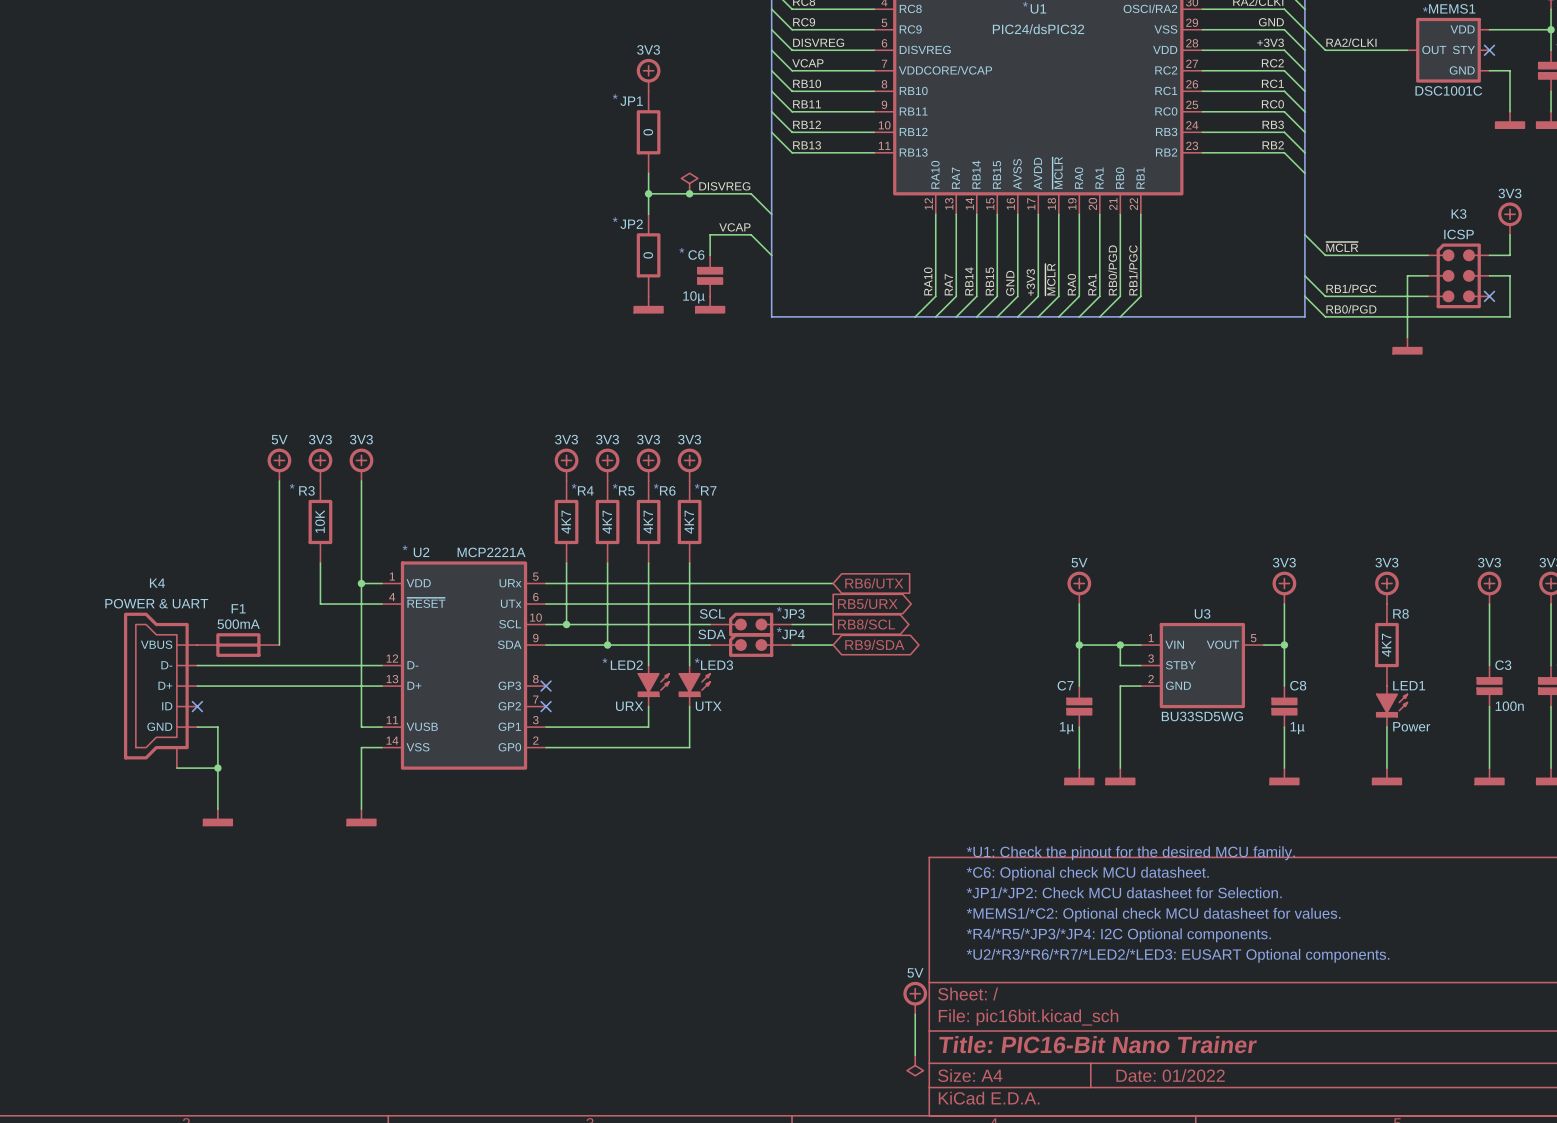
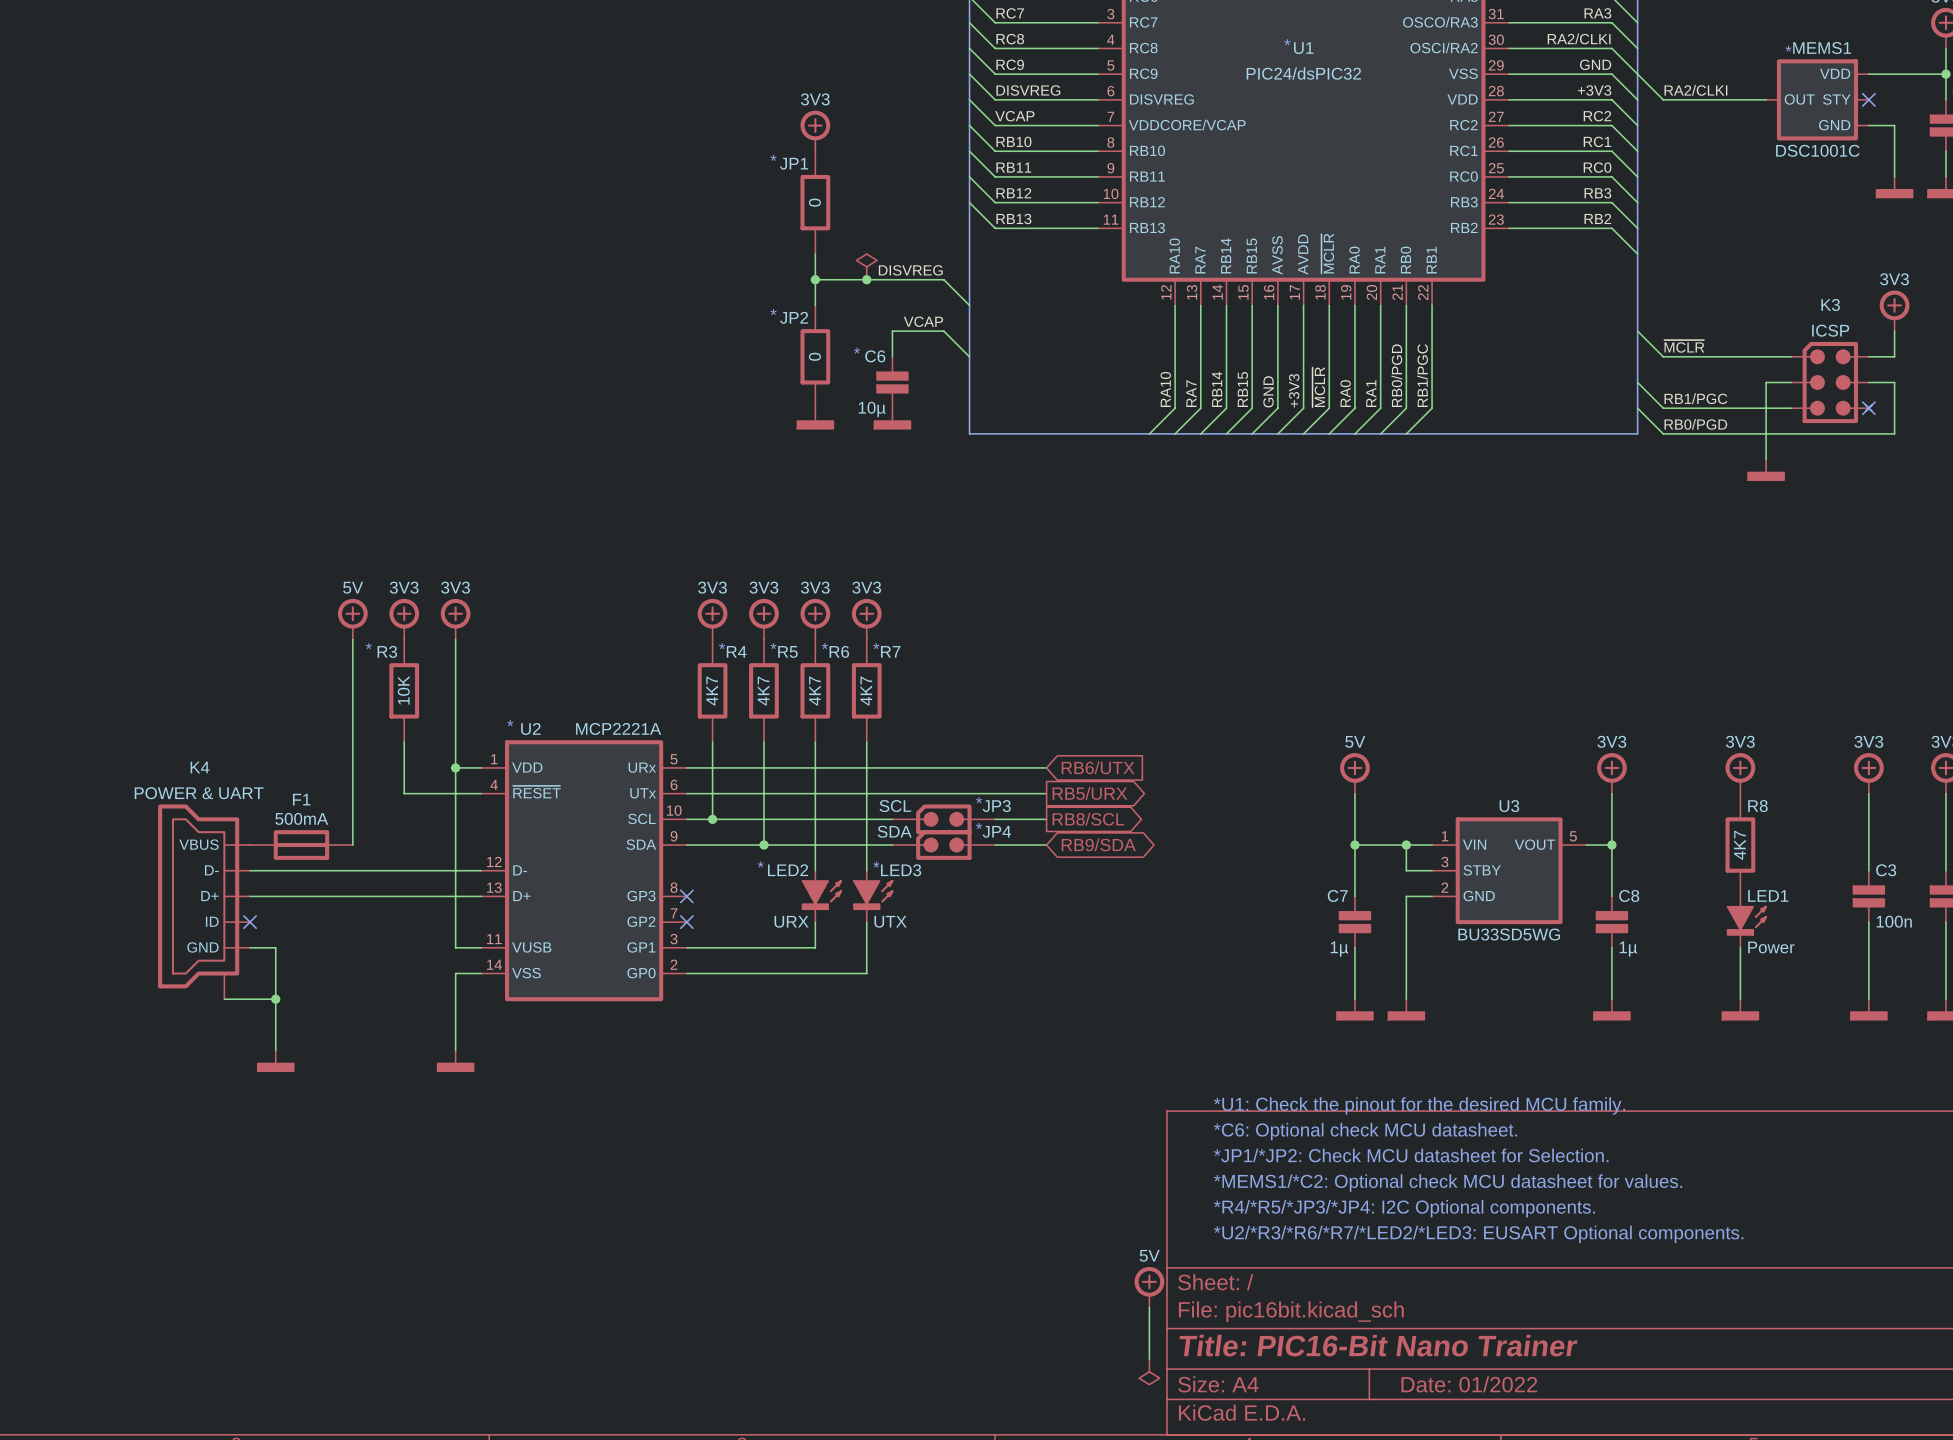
K3 symbol: [1427, 243, 1490, 309] -> [1791, 341, 1872, 424]

